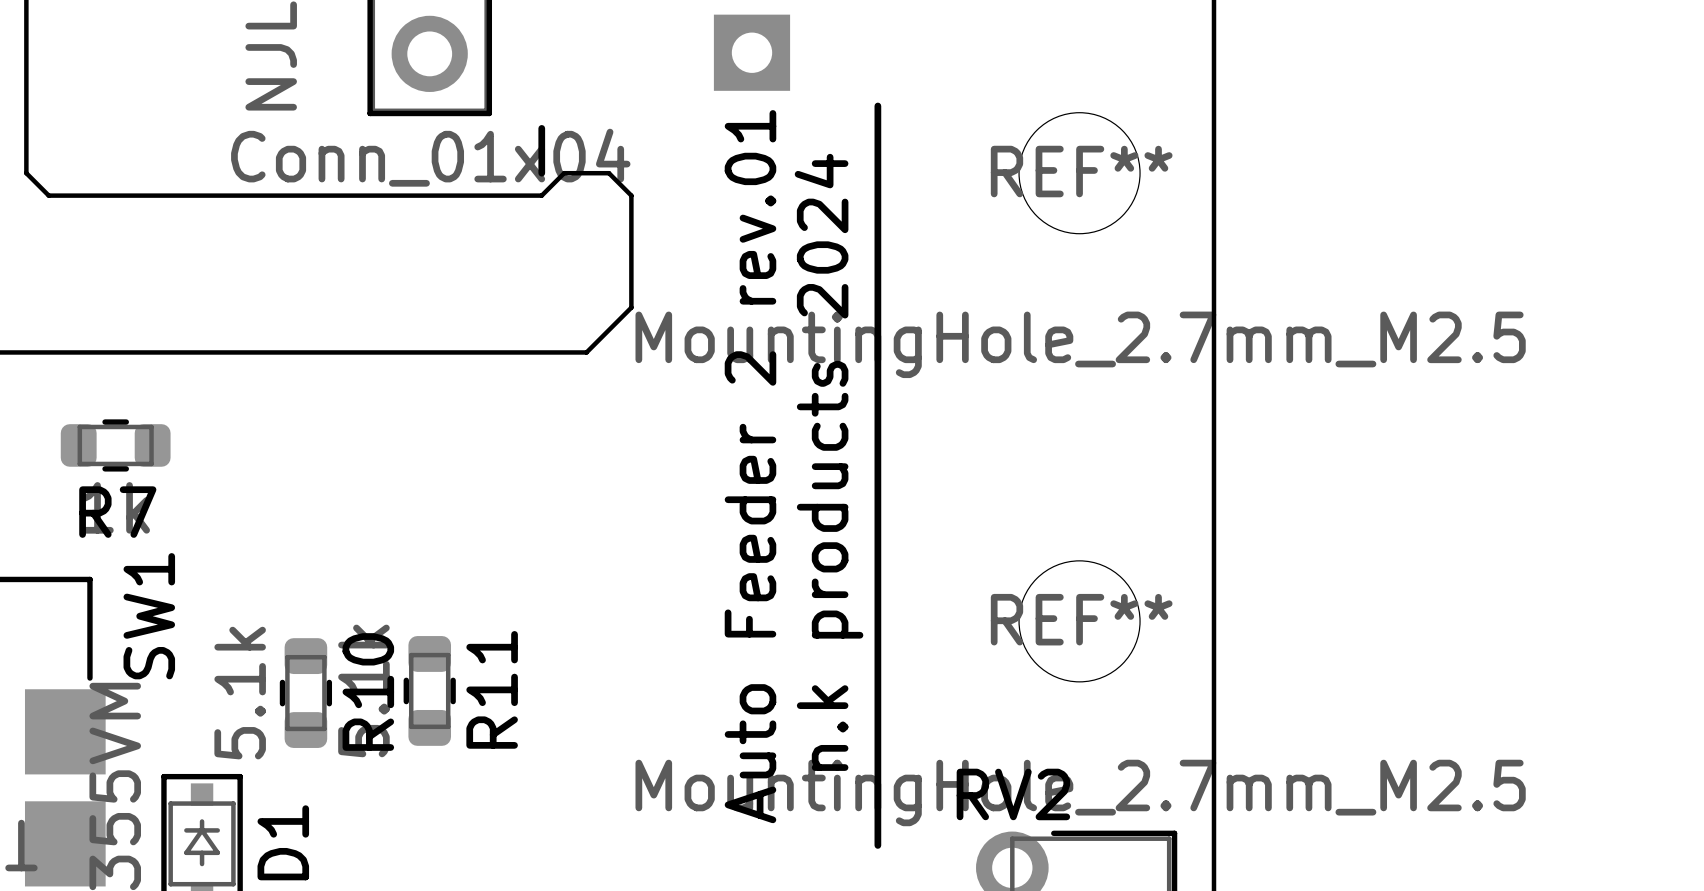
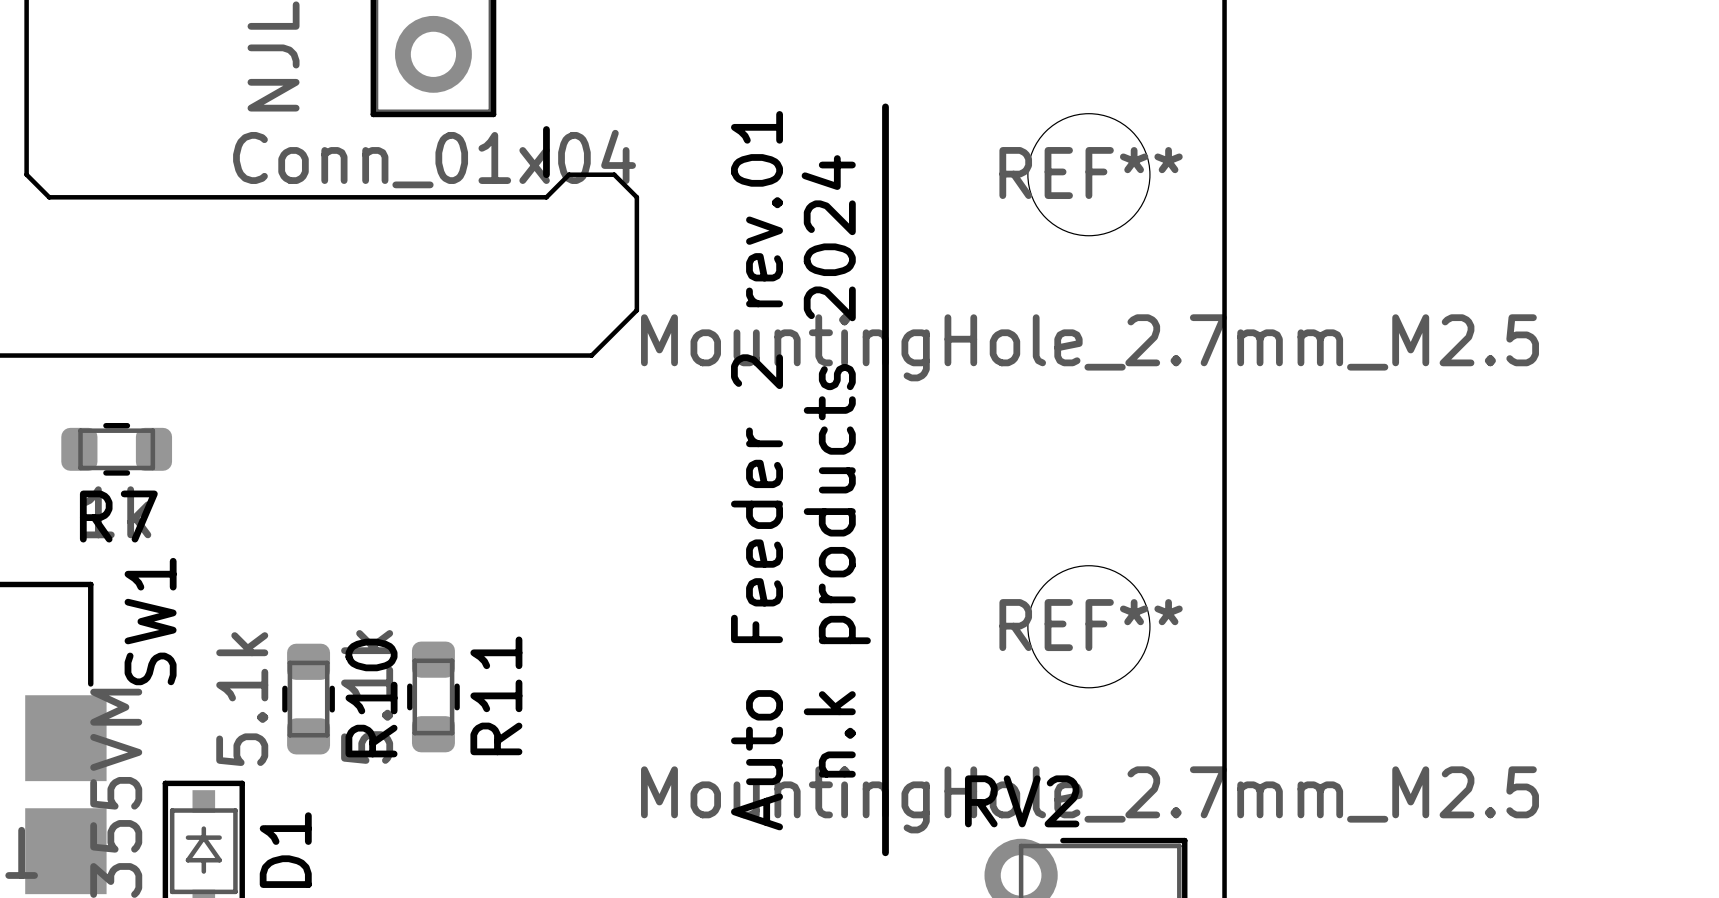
part: (751, 52) -> none

